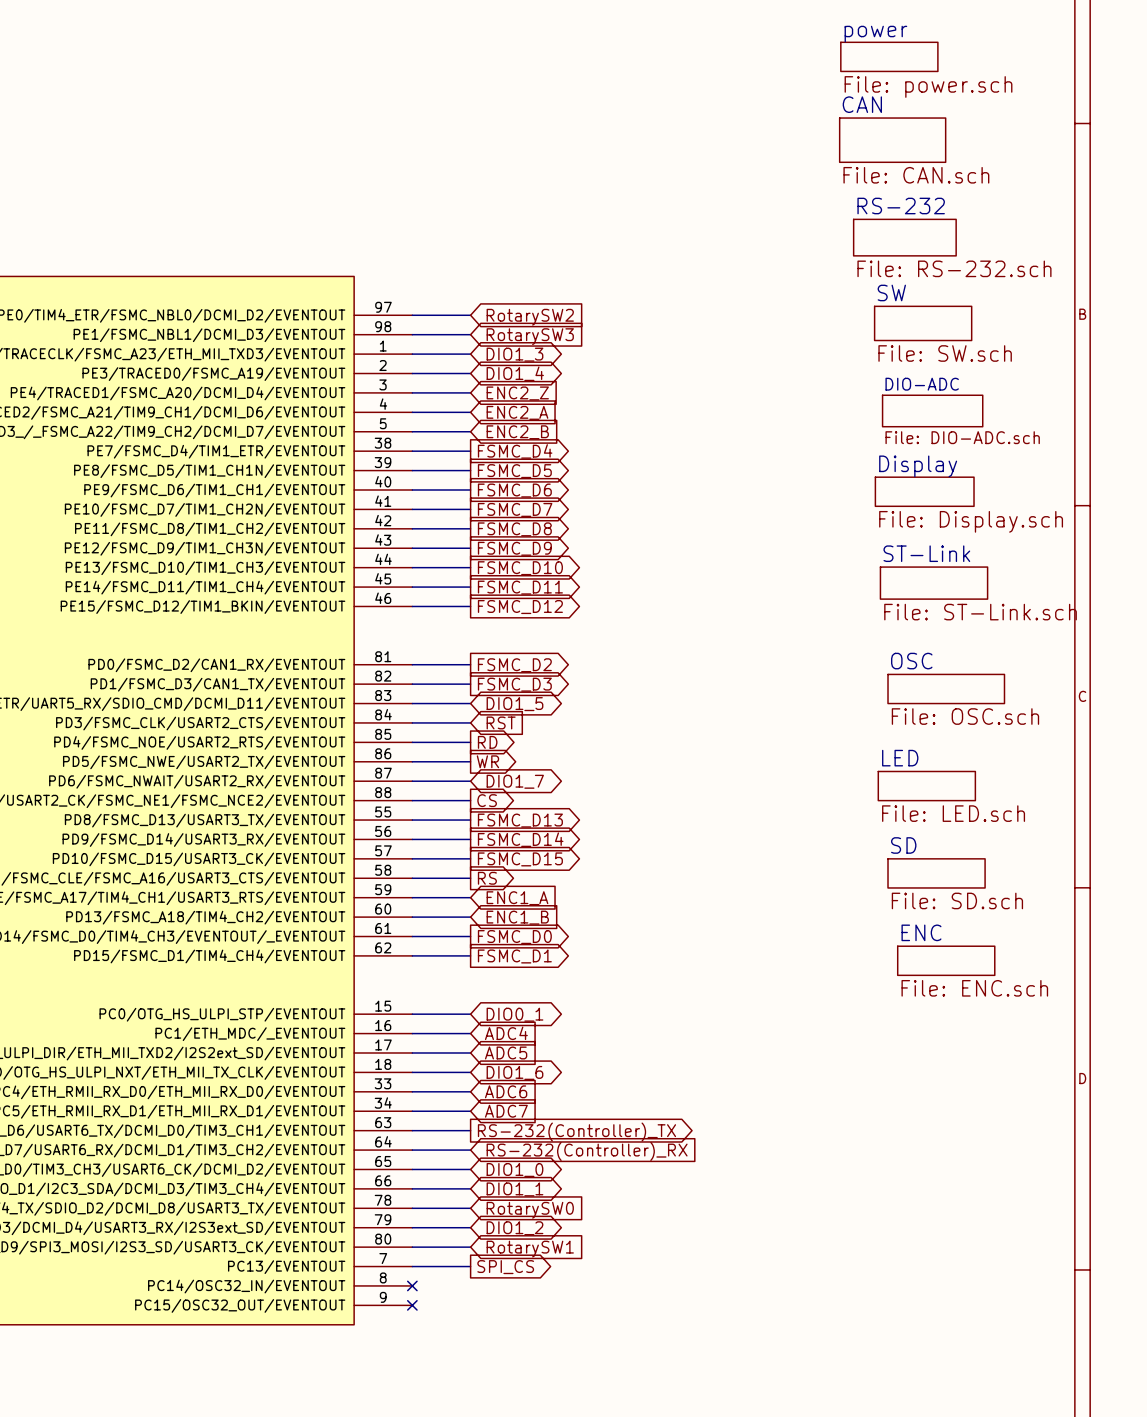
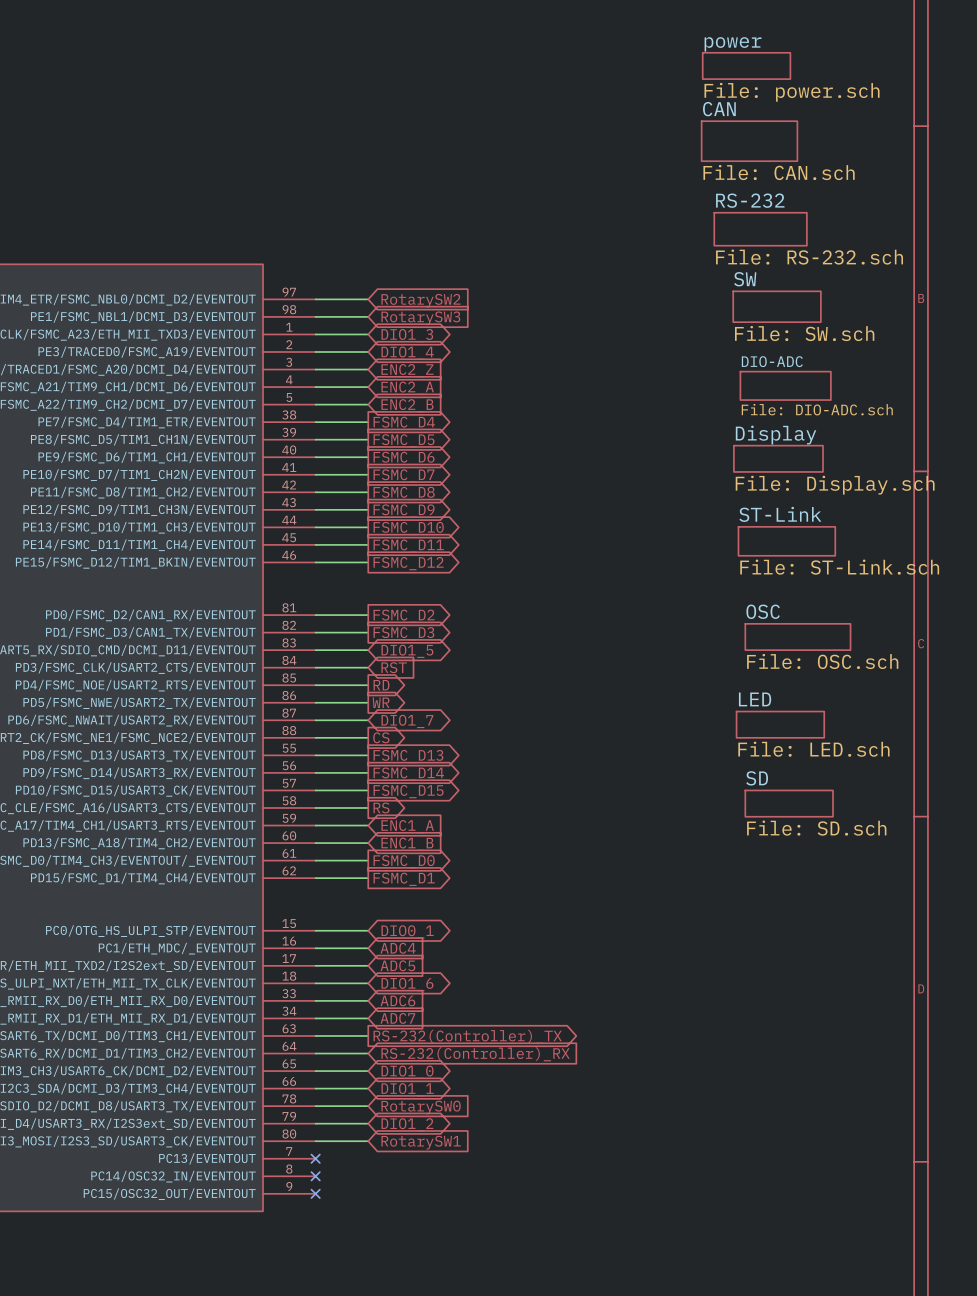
sheet ENC: File: ENC.sch (946, 960) -> none
wire: (412, 1266) (470, 1266) -> none
no-connect mark: none -> (315, 1158)
global label: SPI_CS (505, 1267) -> none

